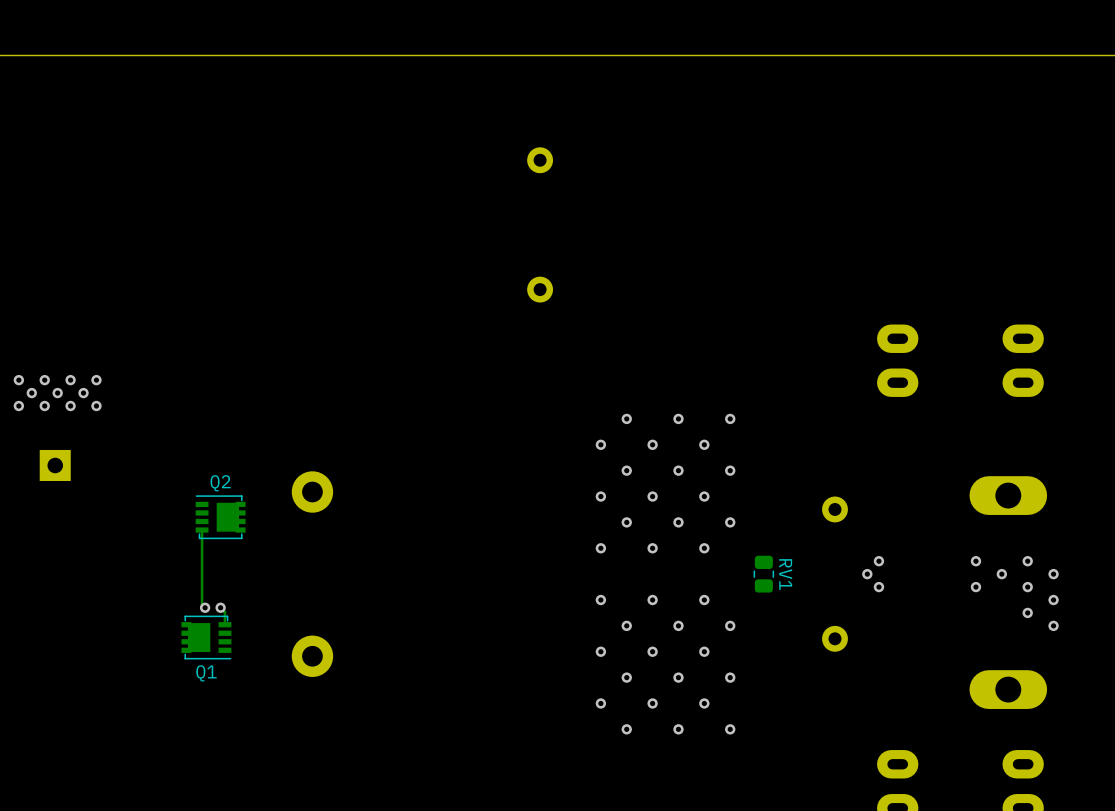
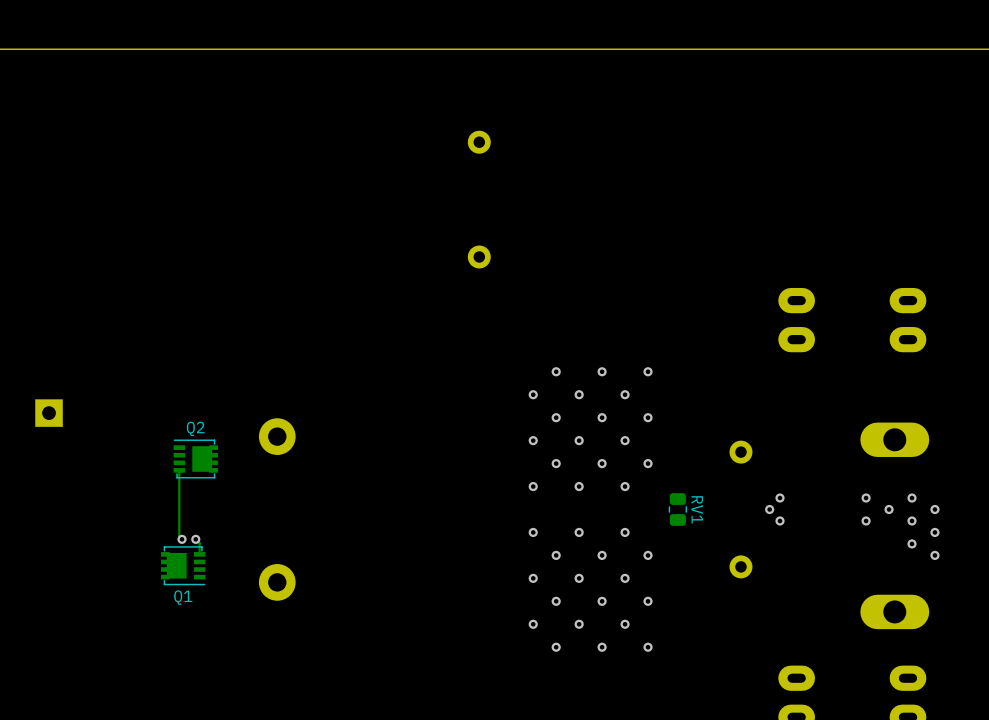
via: (18, 380) -> none
via: (44, 380) -> none
via: (70, 380) -> none
via: (96, 380) -> none
via: (31, 393) -> none
via: (57, 393) -> none
via: (83, 393) -> none
via: (18, 406) -> none
via: (44, 406) -> none
via: (70, 406) -> none
via: (96, 406) -> none

